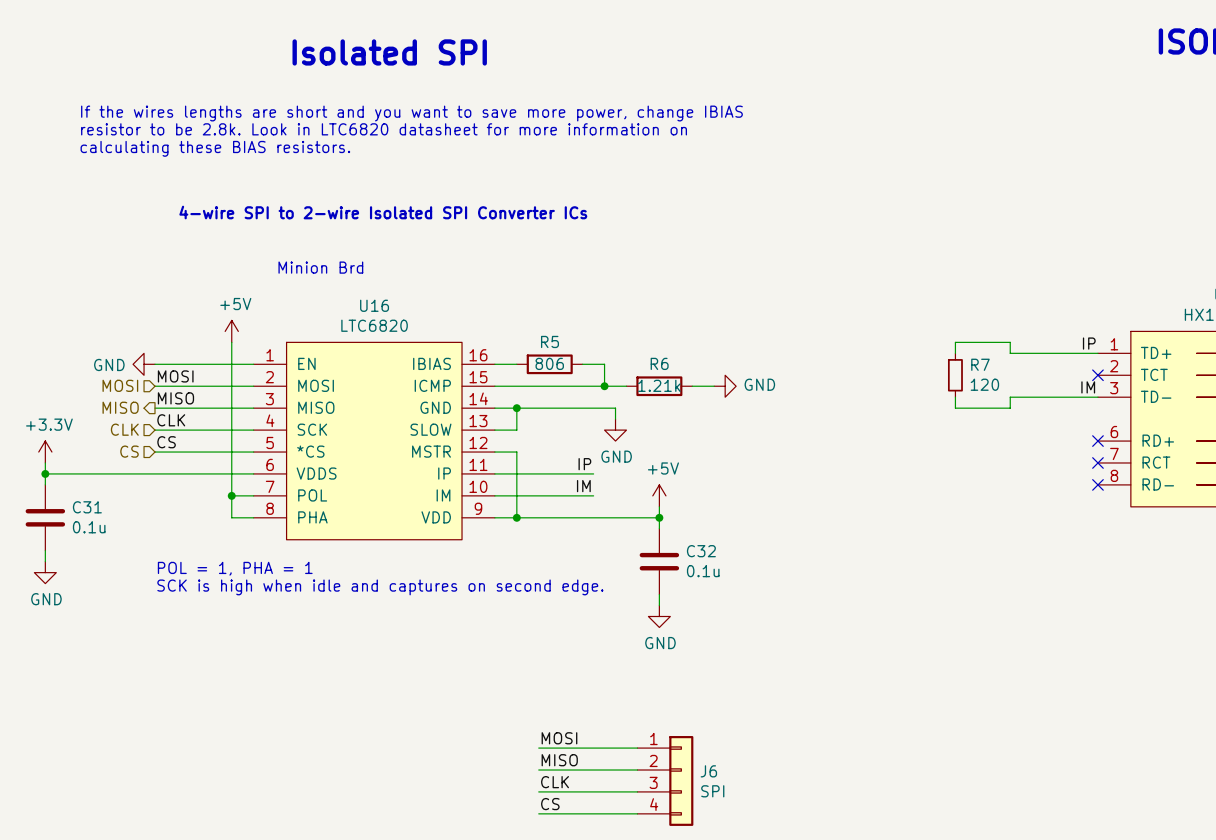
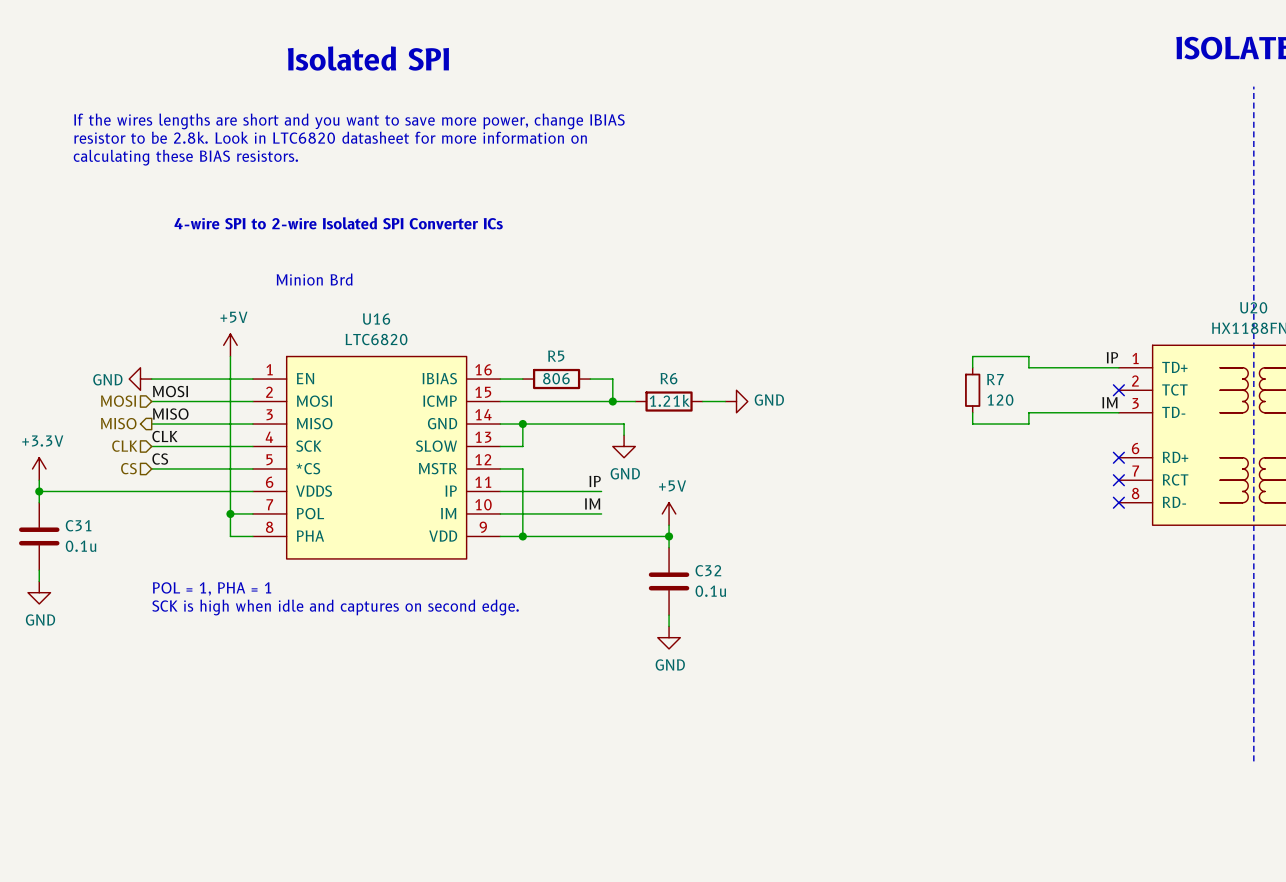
label: MOSI (559, 738) -> none
wire: (538, 748) (637, 748) -> none
label: MISO (559, 760) -> none
wire: (538, 770) (637, 770) -> none
J6: SPI (665, 780) -> none
label: CLK (555, 782) -> none
wire: (538, 791) (637, 791) -> none
label: CS (550, 804) -> none
wire: (538, 813) (637, 813) -> none

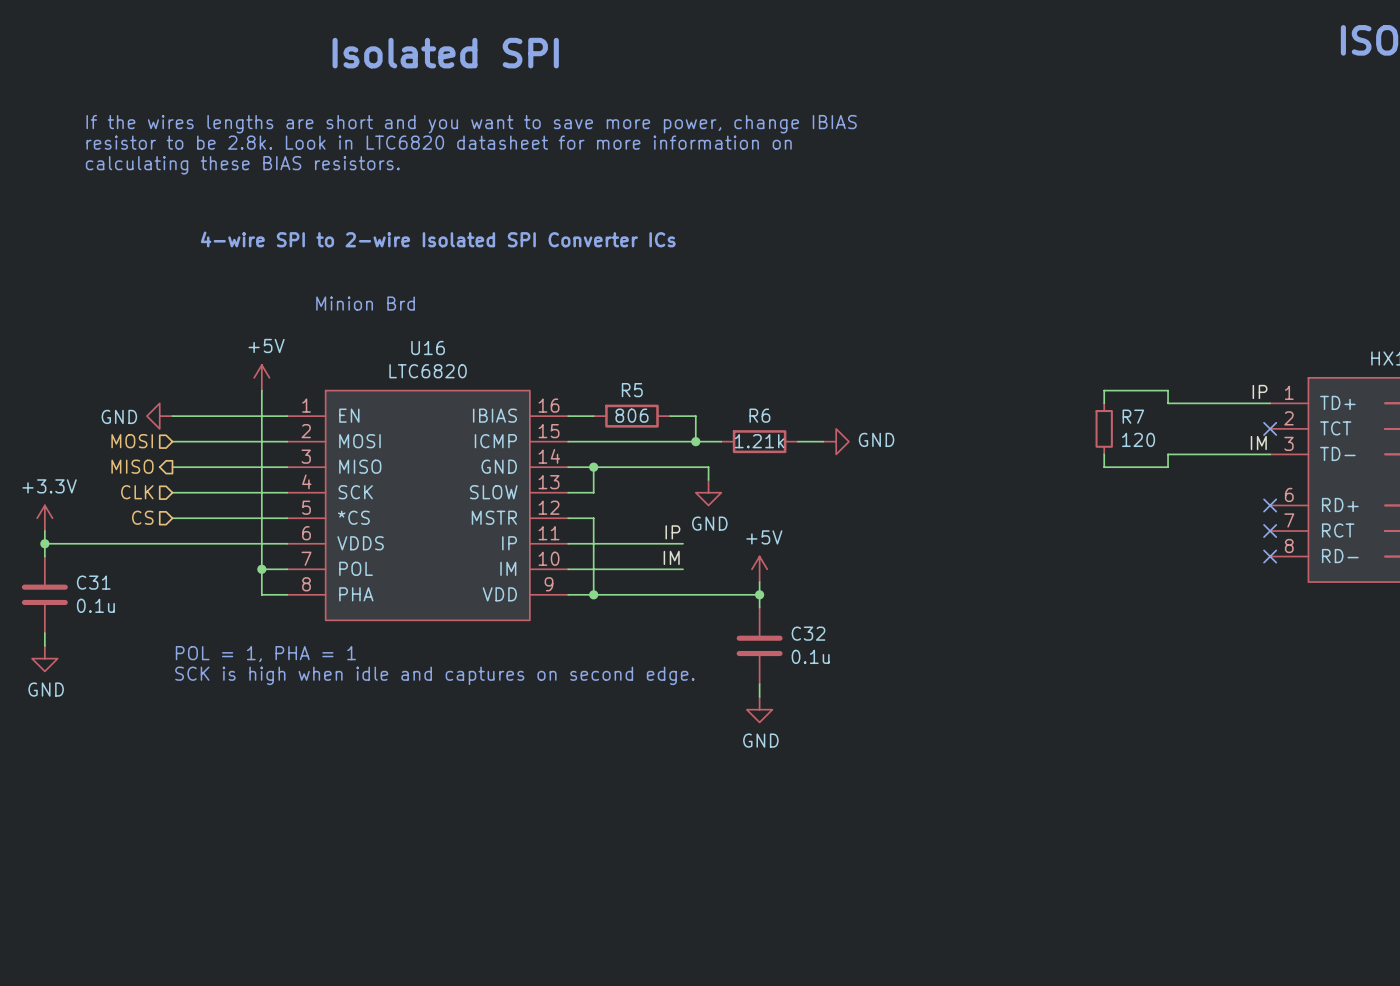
label: MOSI (170, 391) -> none
label: MISO (170, 414) -> none
label: CLK (164, 436) -> none
label: CS (160, 459) -> none

